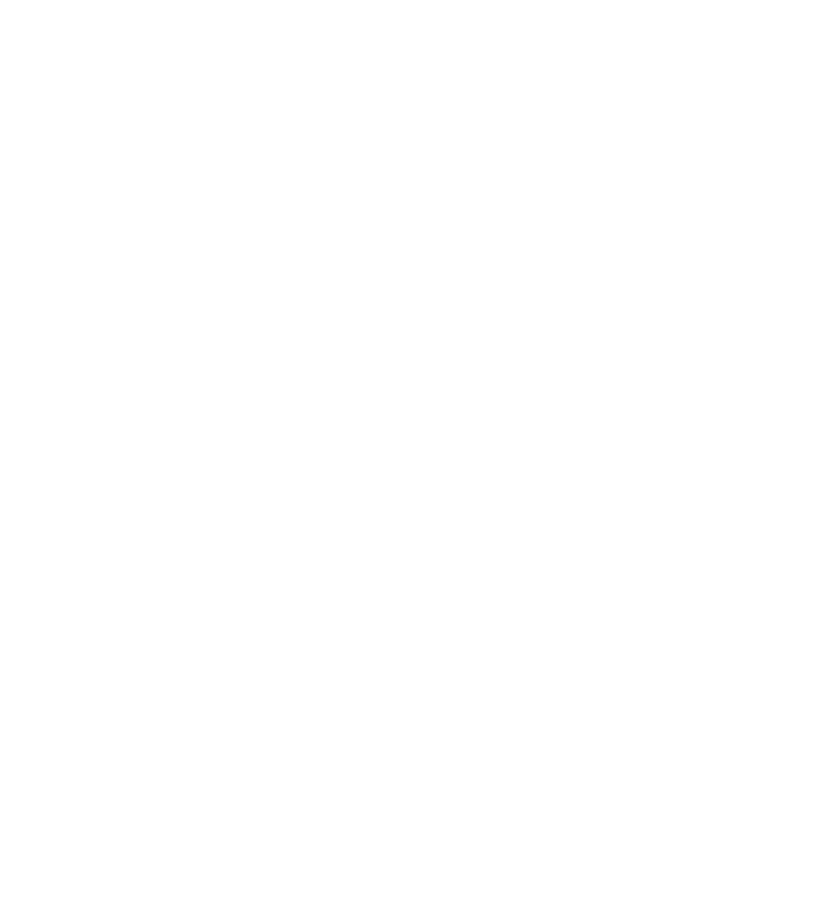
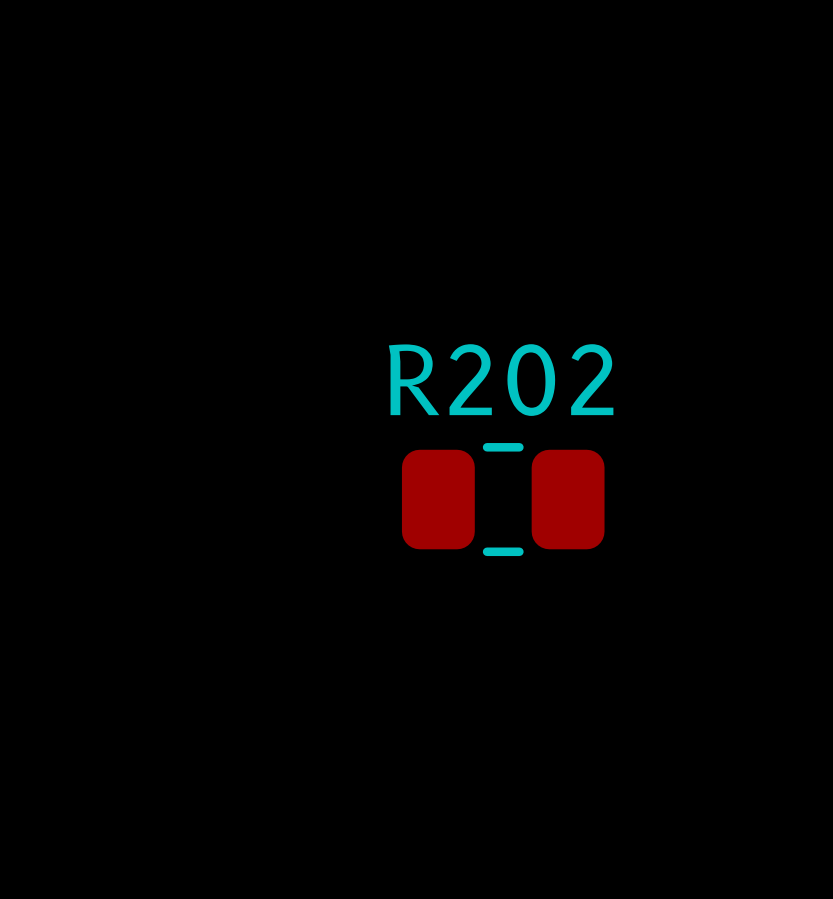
R202: none -> (503, 499)

